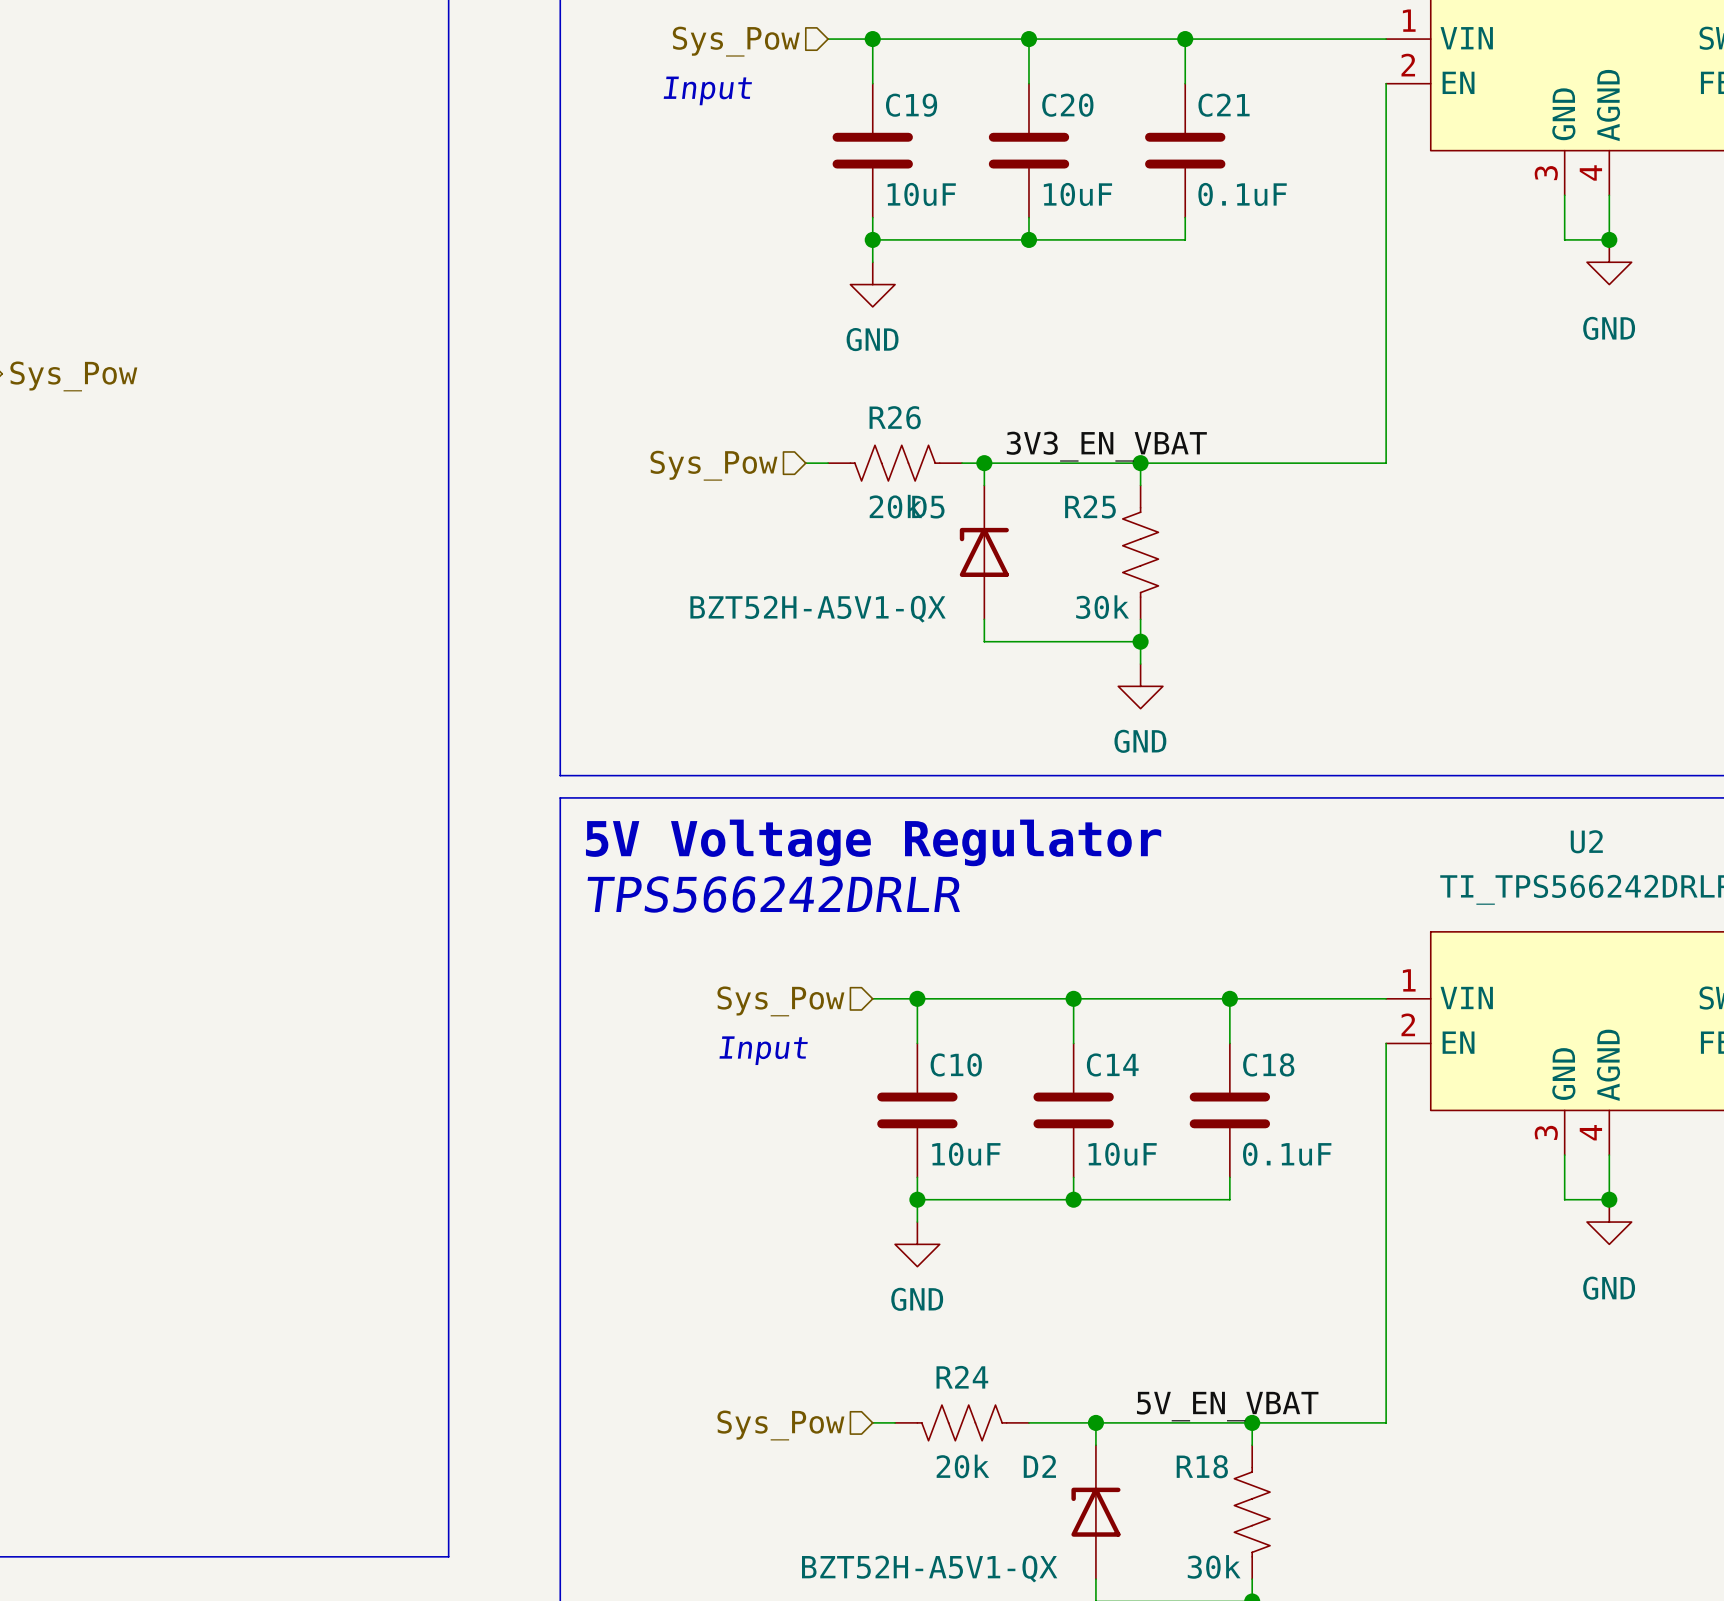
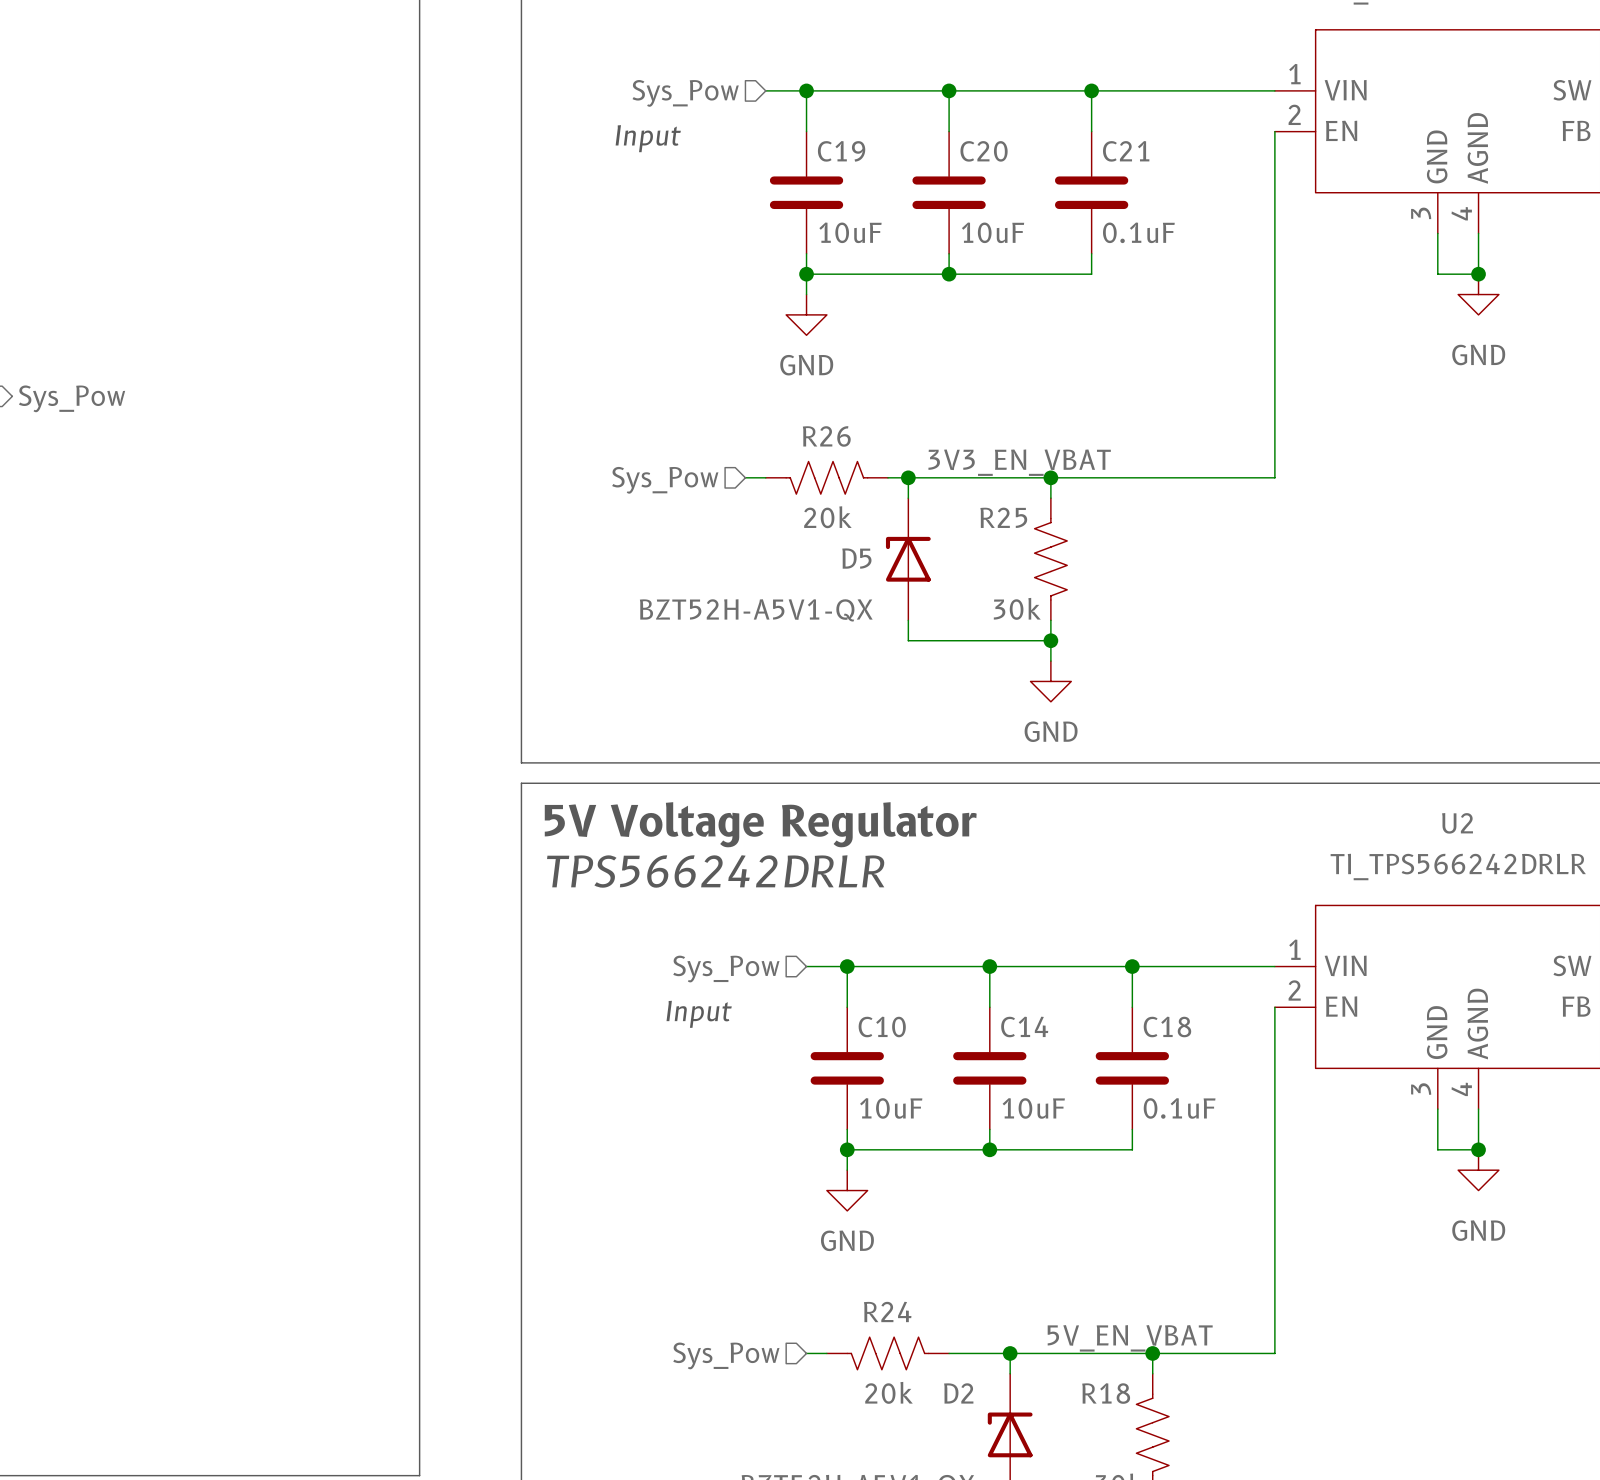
D5 name position: D5 (928, 507) -> D5 (856, 558)

